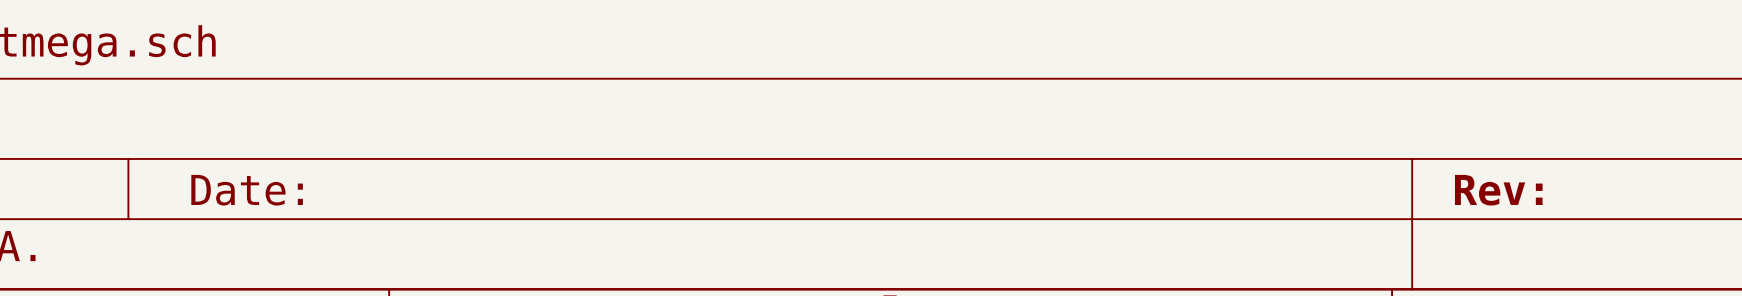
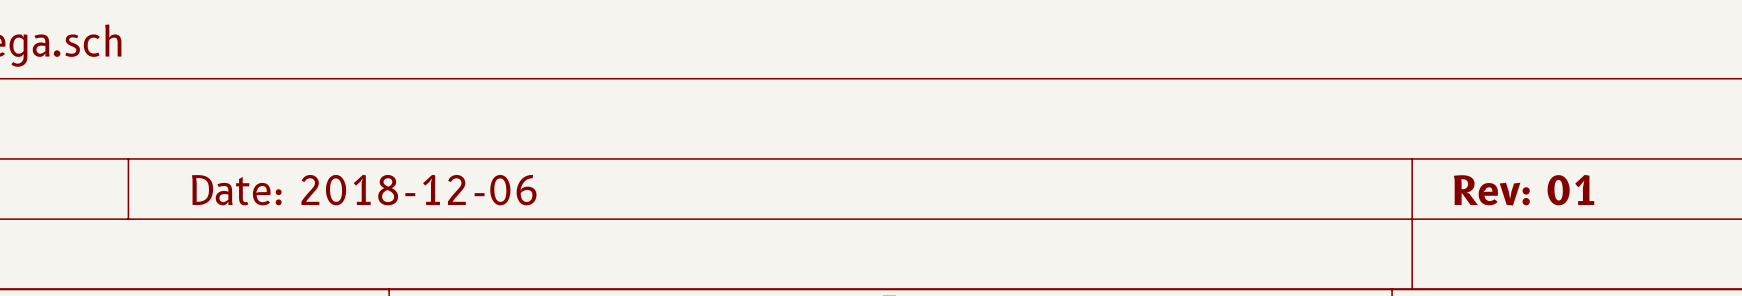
title block: Date: (247, 190) -> Date: 2018-12-06 (364, 190)
title block: Rev: (1498, 190) -> Rev: 01 (1524, 190)

